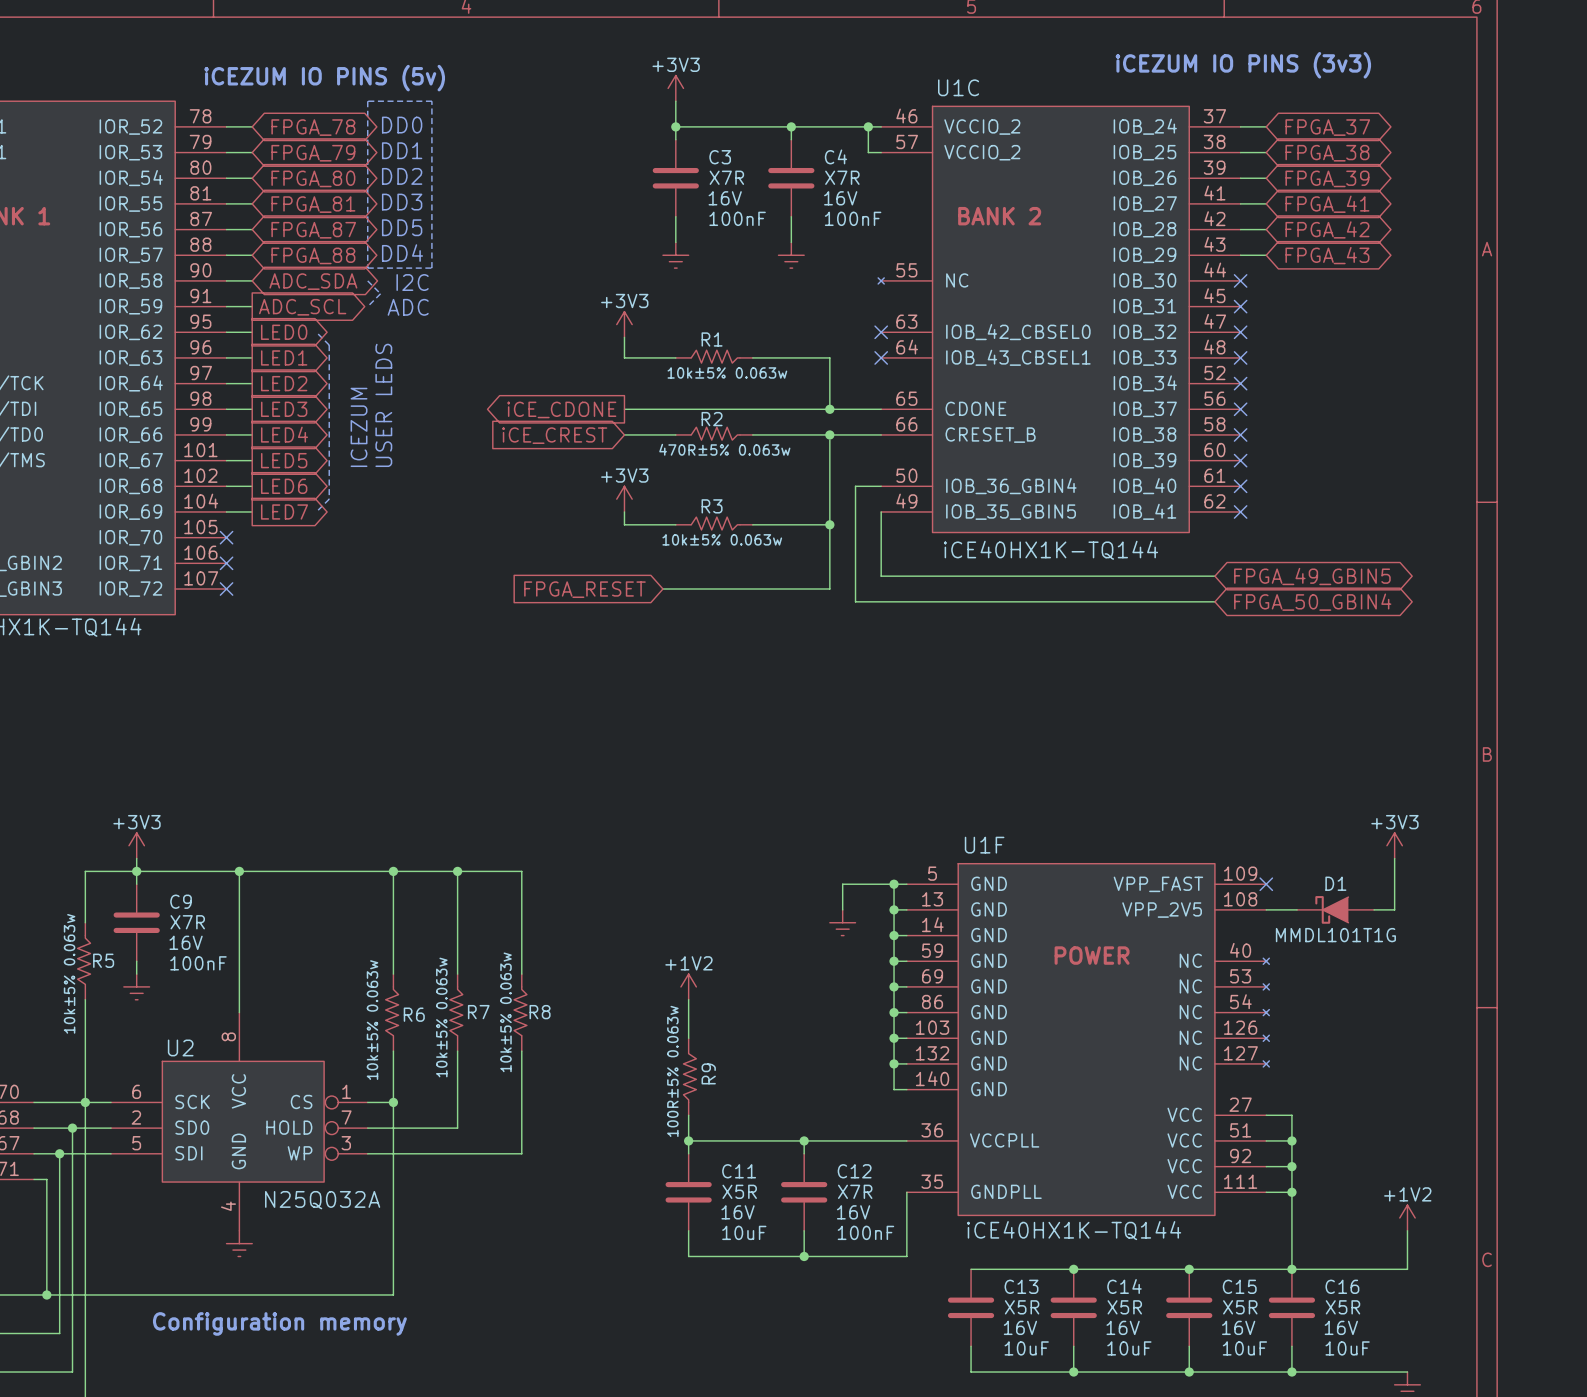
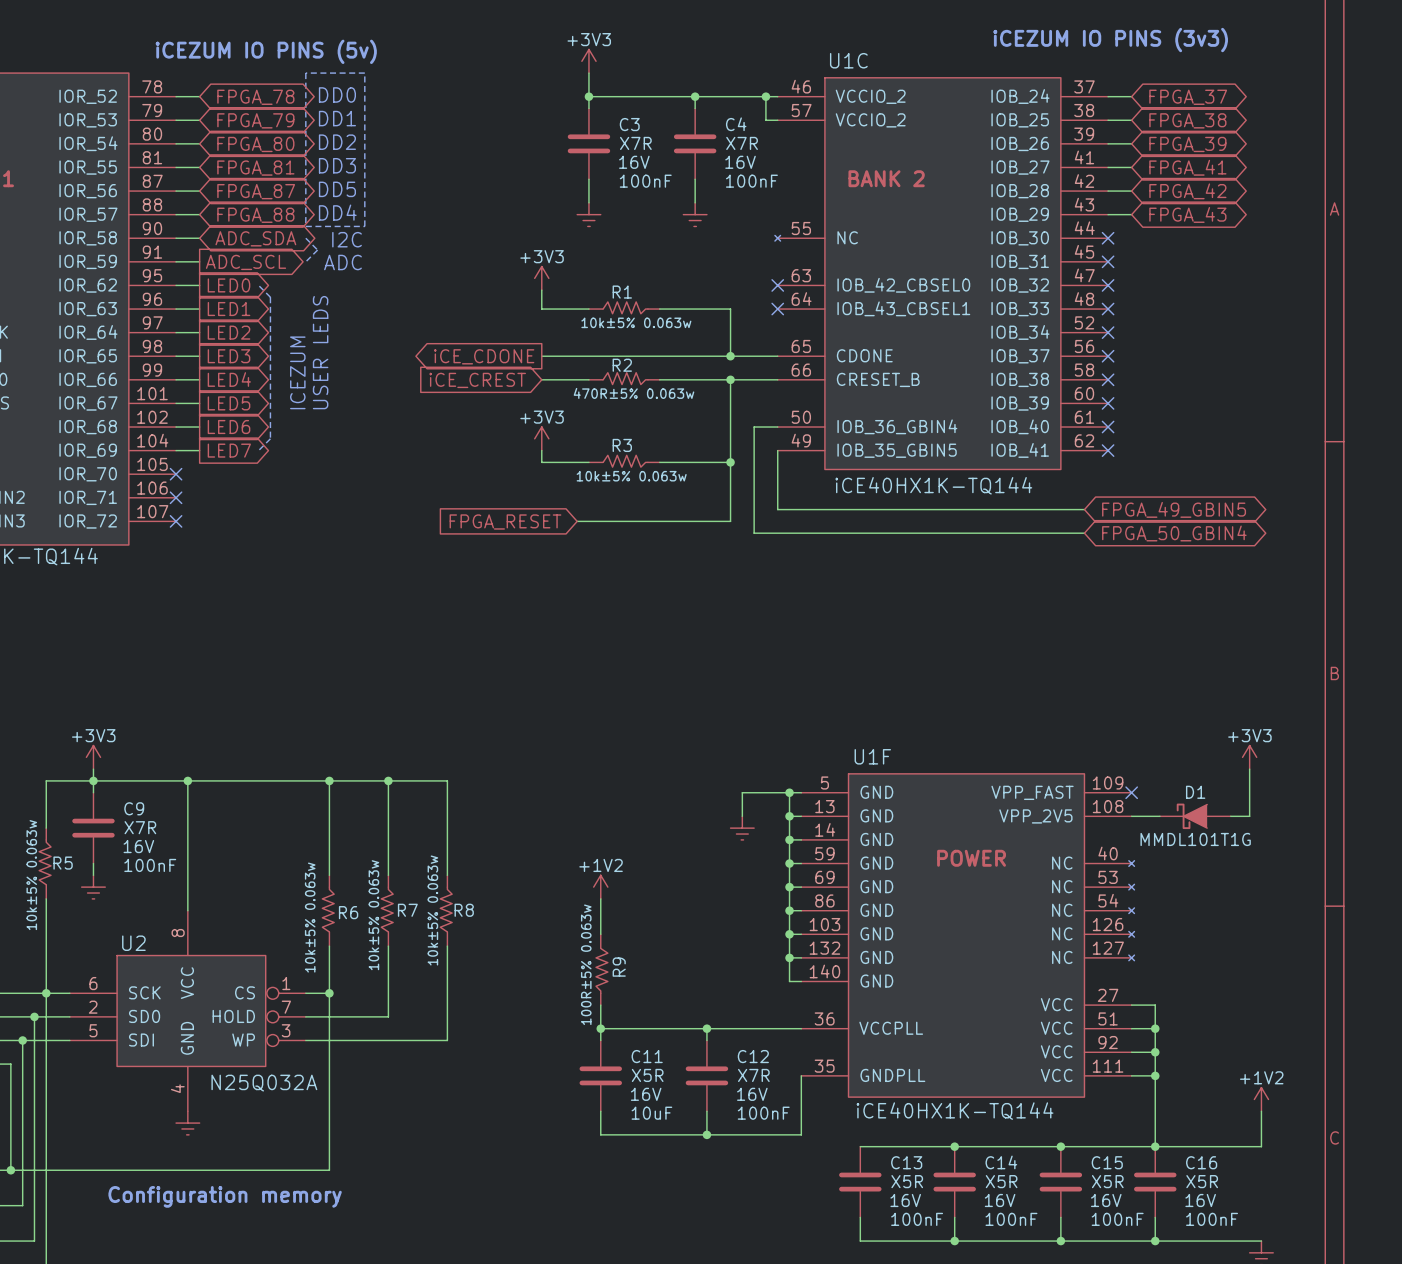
C13 value: 10uF (1026, 1348) -> 100nF (917, 1219)
C14 value: 10uF (1129, 1348) -> 100nF (1011, 1219)
C15 value: 10uF (1244, 1348) -> 100nF (1117, 1219)
C16 value: 10uF (1347, 1348) -> 100nF (1212, 1219)

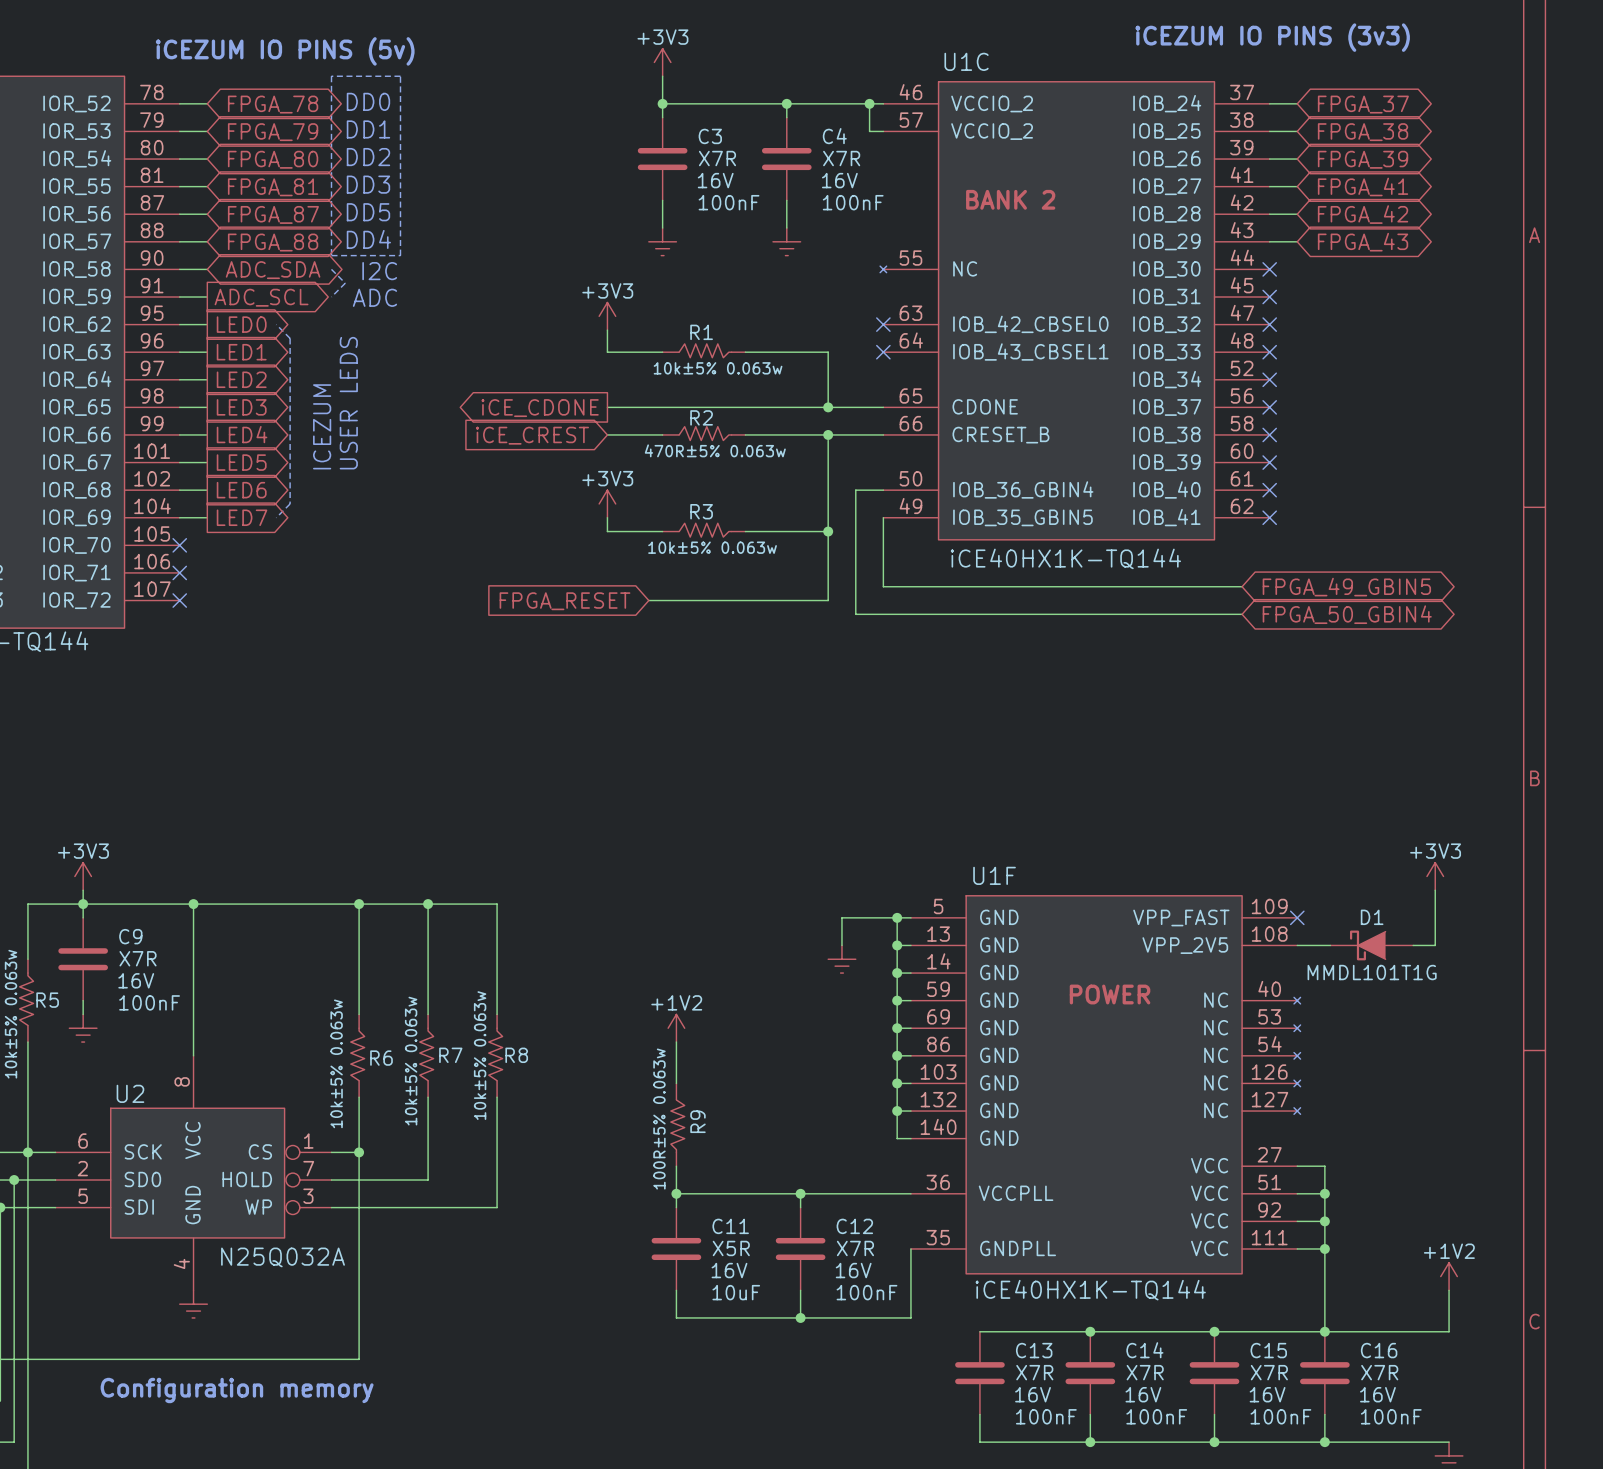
C13 text: X5R (907, 1181) -> X7R (1034, 1372)
C14 text: X5R (1001, 1181) -> X7R (1145, 1372)
C15 text: X5R (1107, 1181) -> X7R (1269, 1372)
C16 text: X5R (1202, 1181) -> X7R (1379, 1372)

